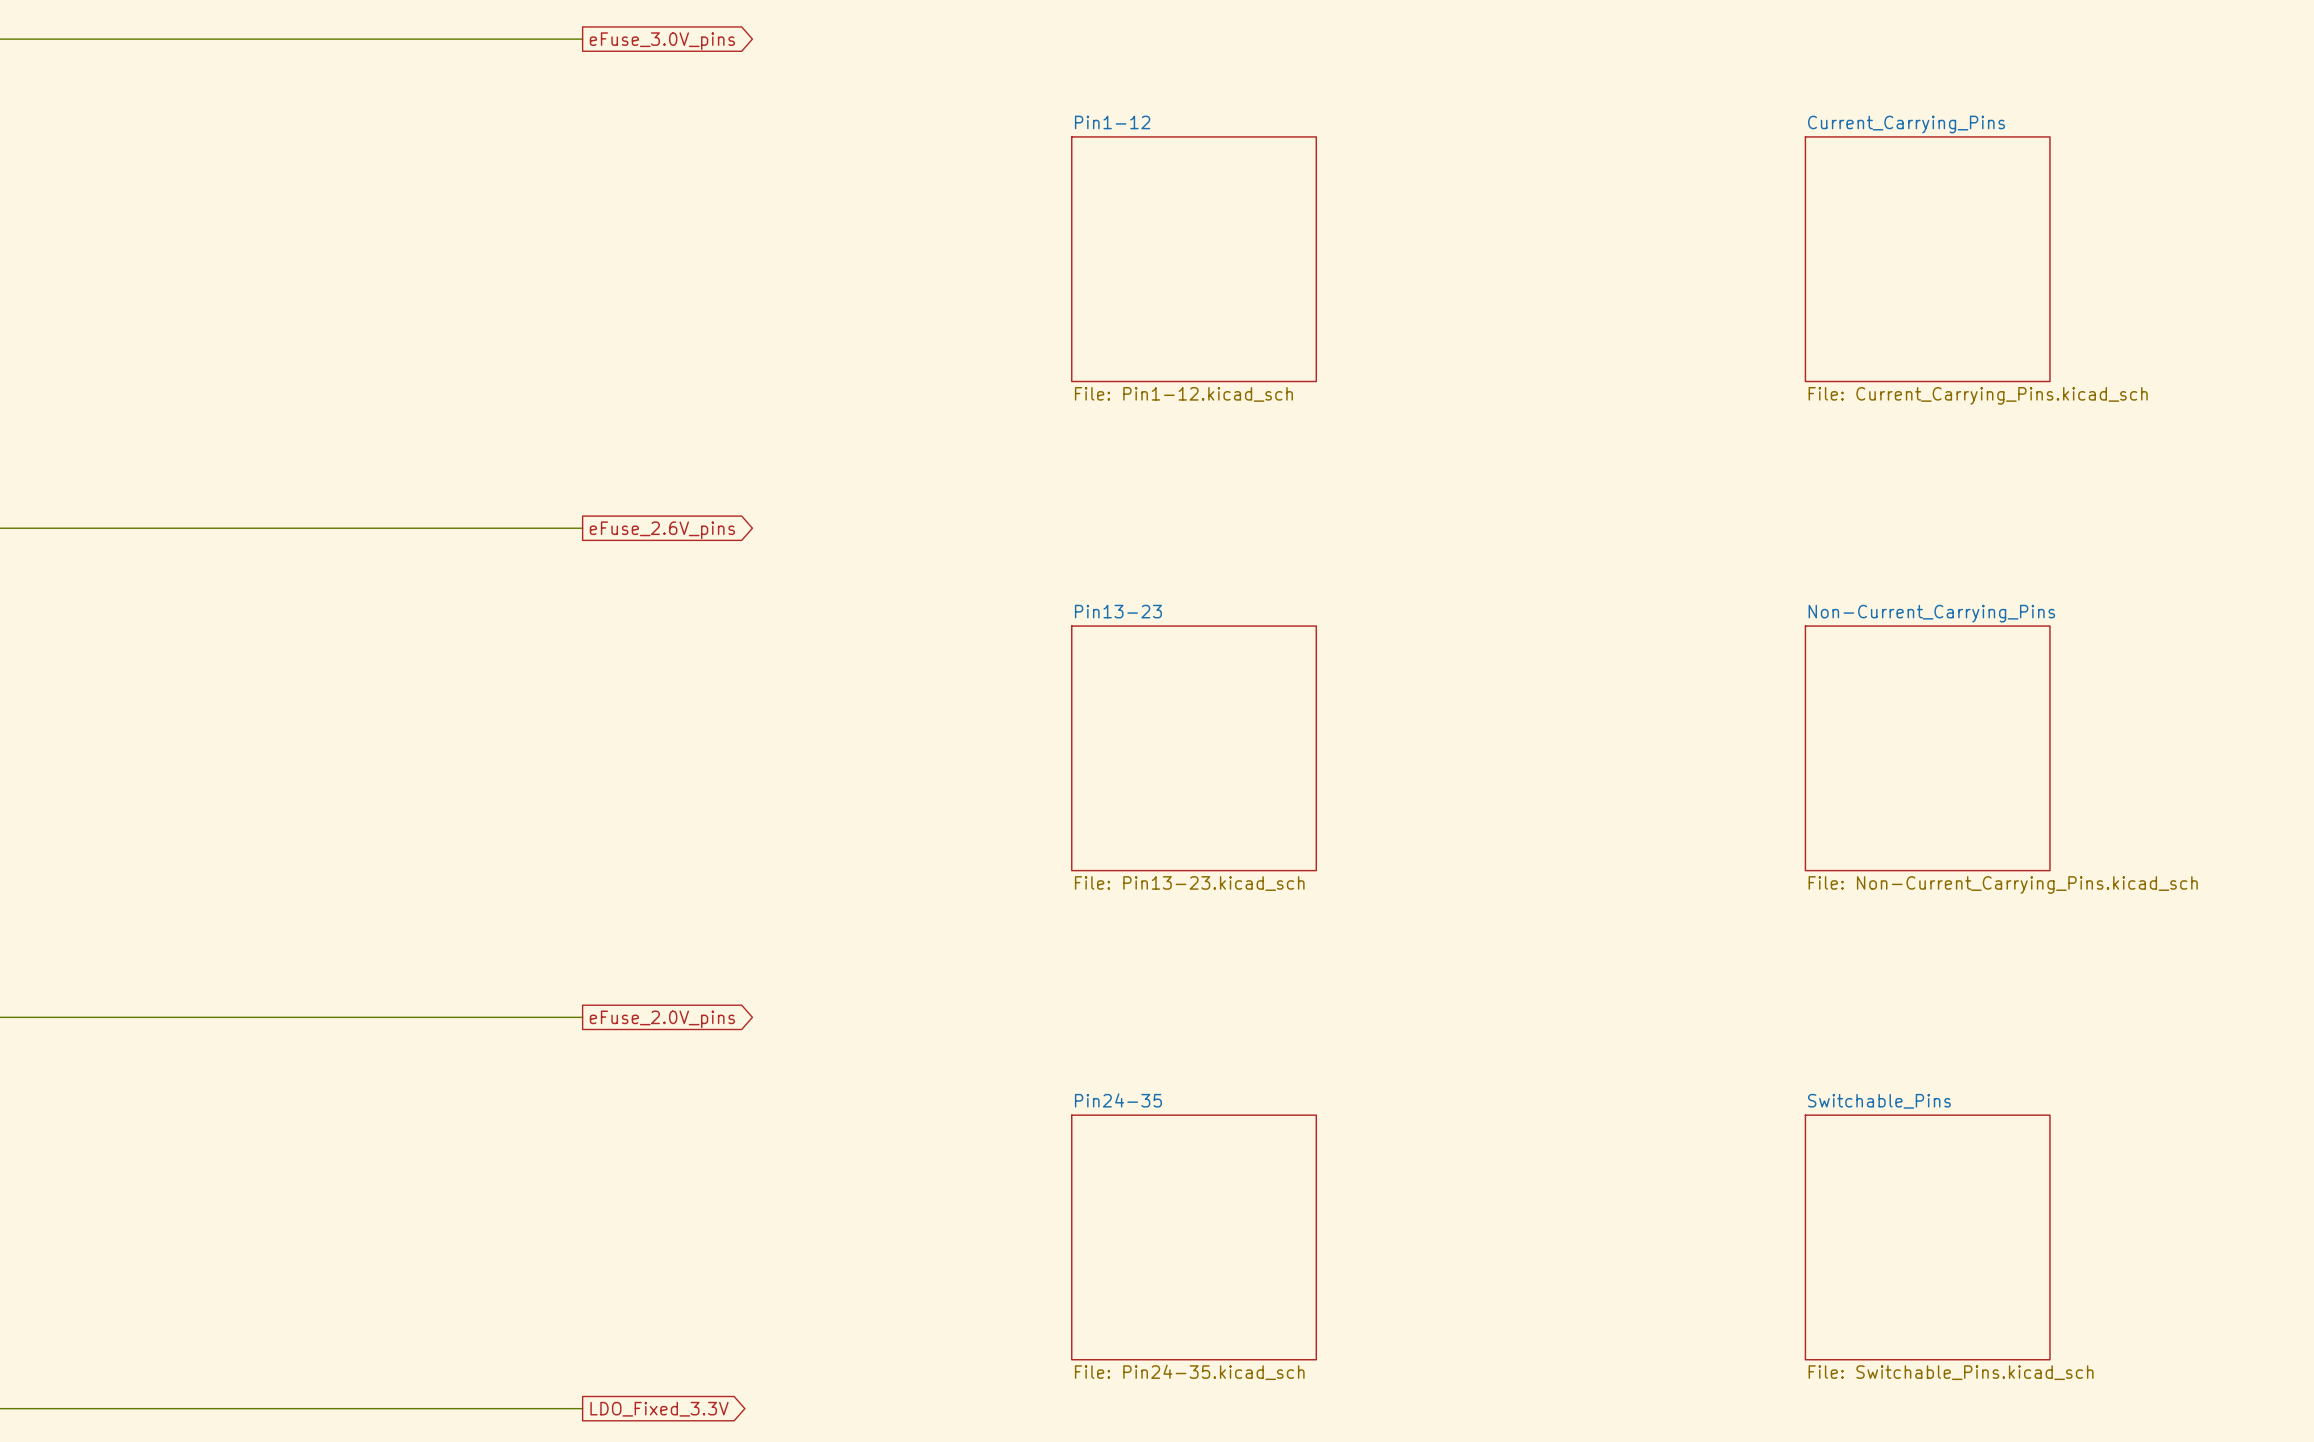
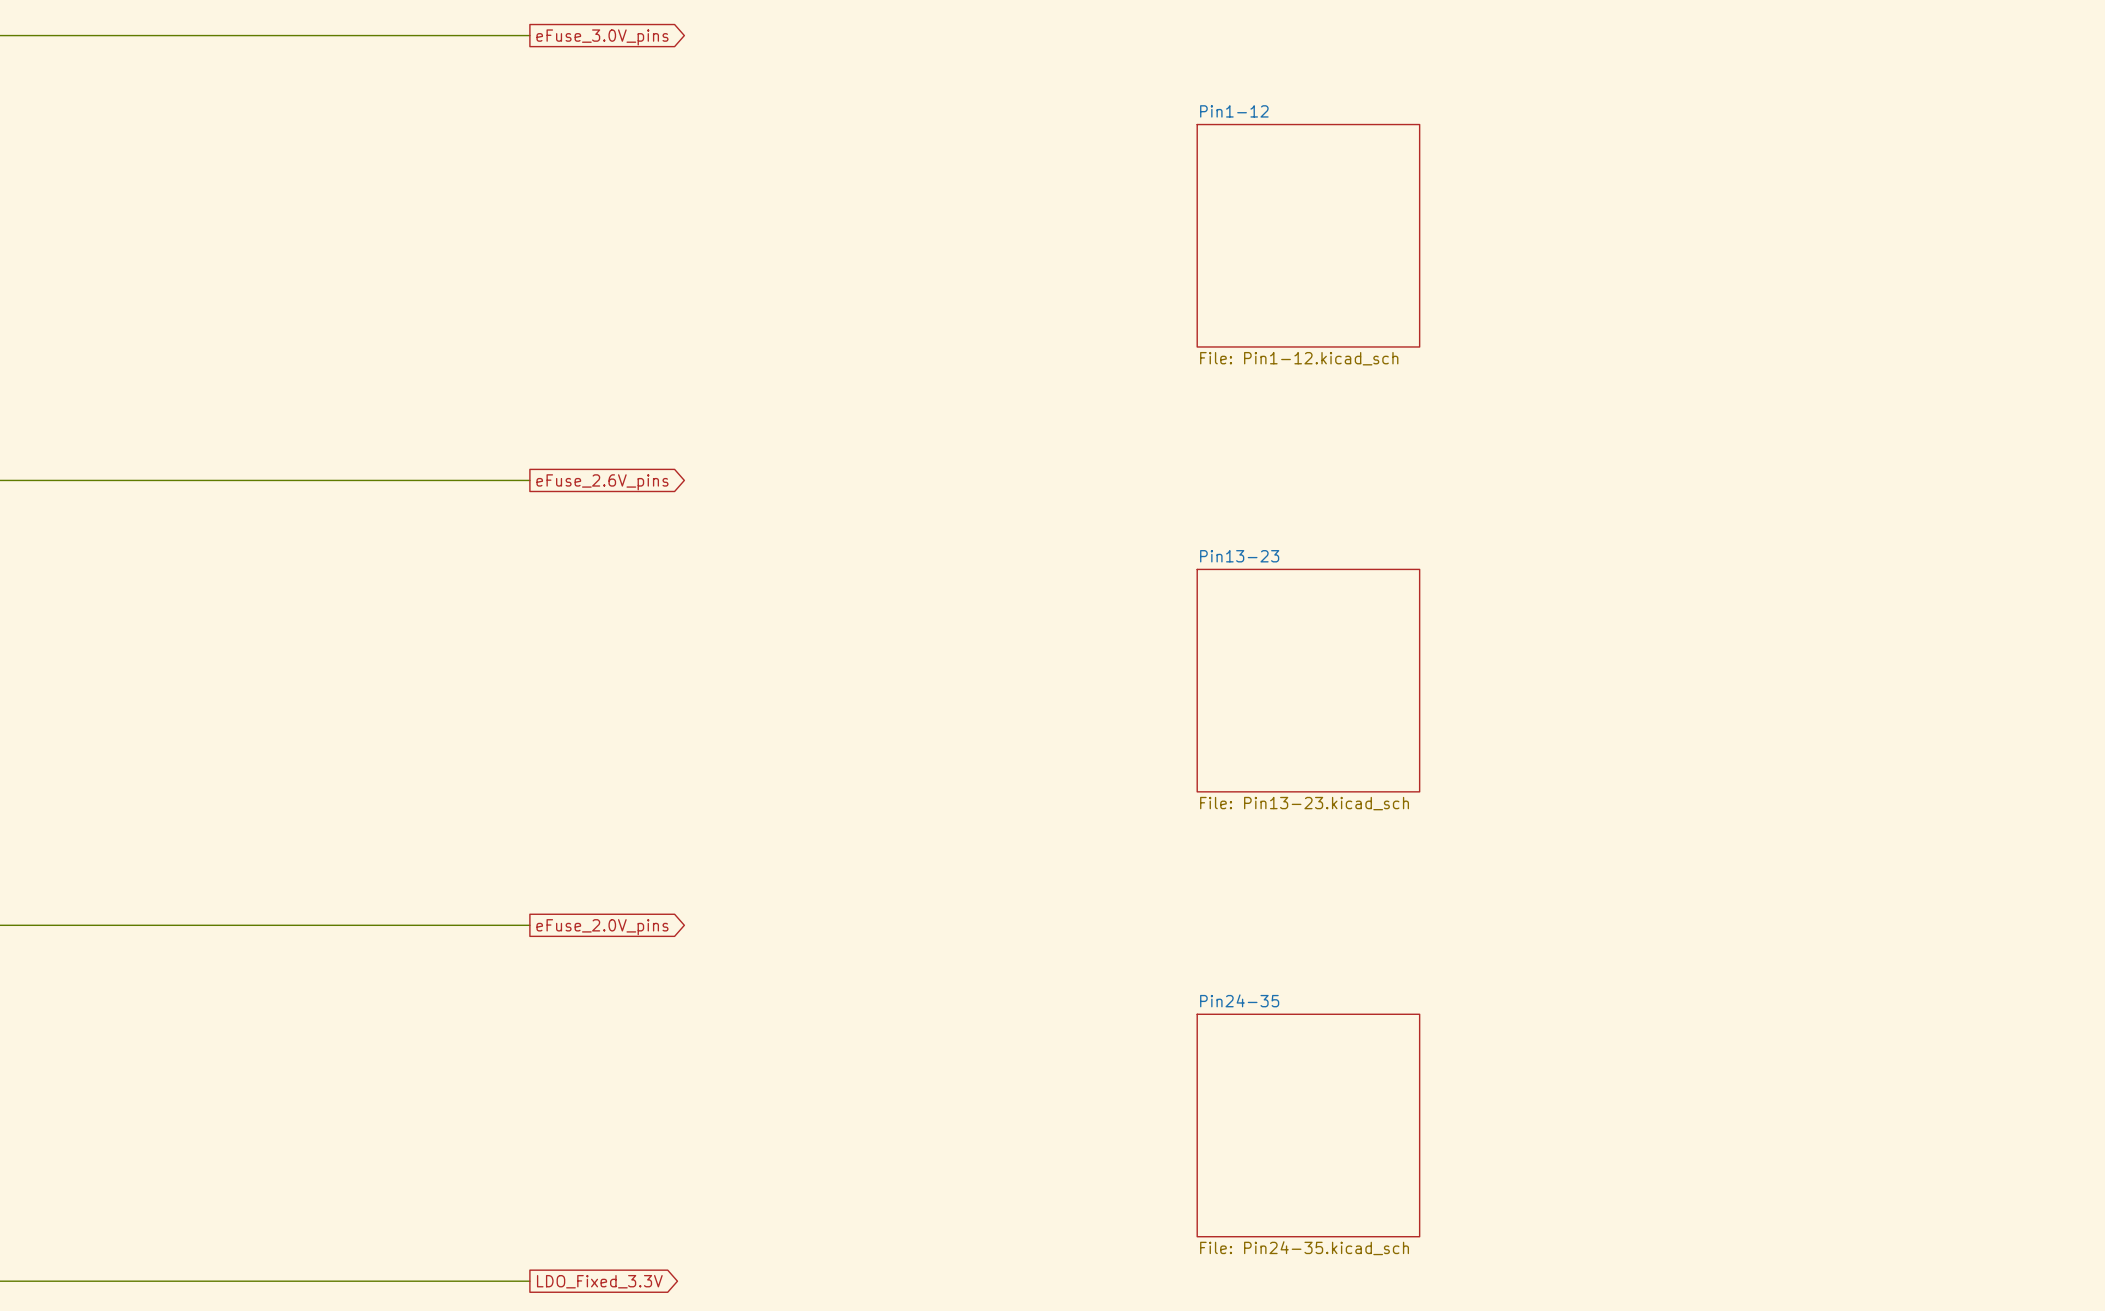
sheet Pin1-12 position: (1194, 259) -> (1308, 235)
sheet Current_Carrying_Pins: File: Current_Carrying_Pins.kicad_sch (1927, 259) -> none
sheet Pin13-23 position: (1194, 748) -> (1308, 680)
sheet Non-Current_Carrying_Pins: File: Non-Current_Carrying_Pins.kicad_sch (1927, 748) -> none
sheet Pin24-35 position: (1194, 1237) -> (1308, 1125)
sheet Switchable_Pins: File: Switchable_Pins.kicad_sch (1927, 1237) -> none

